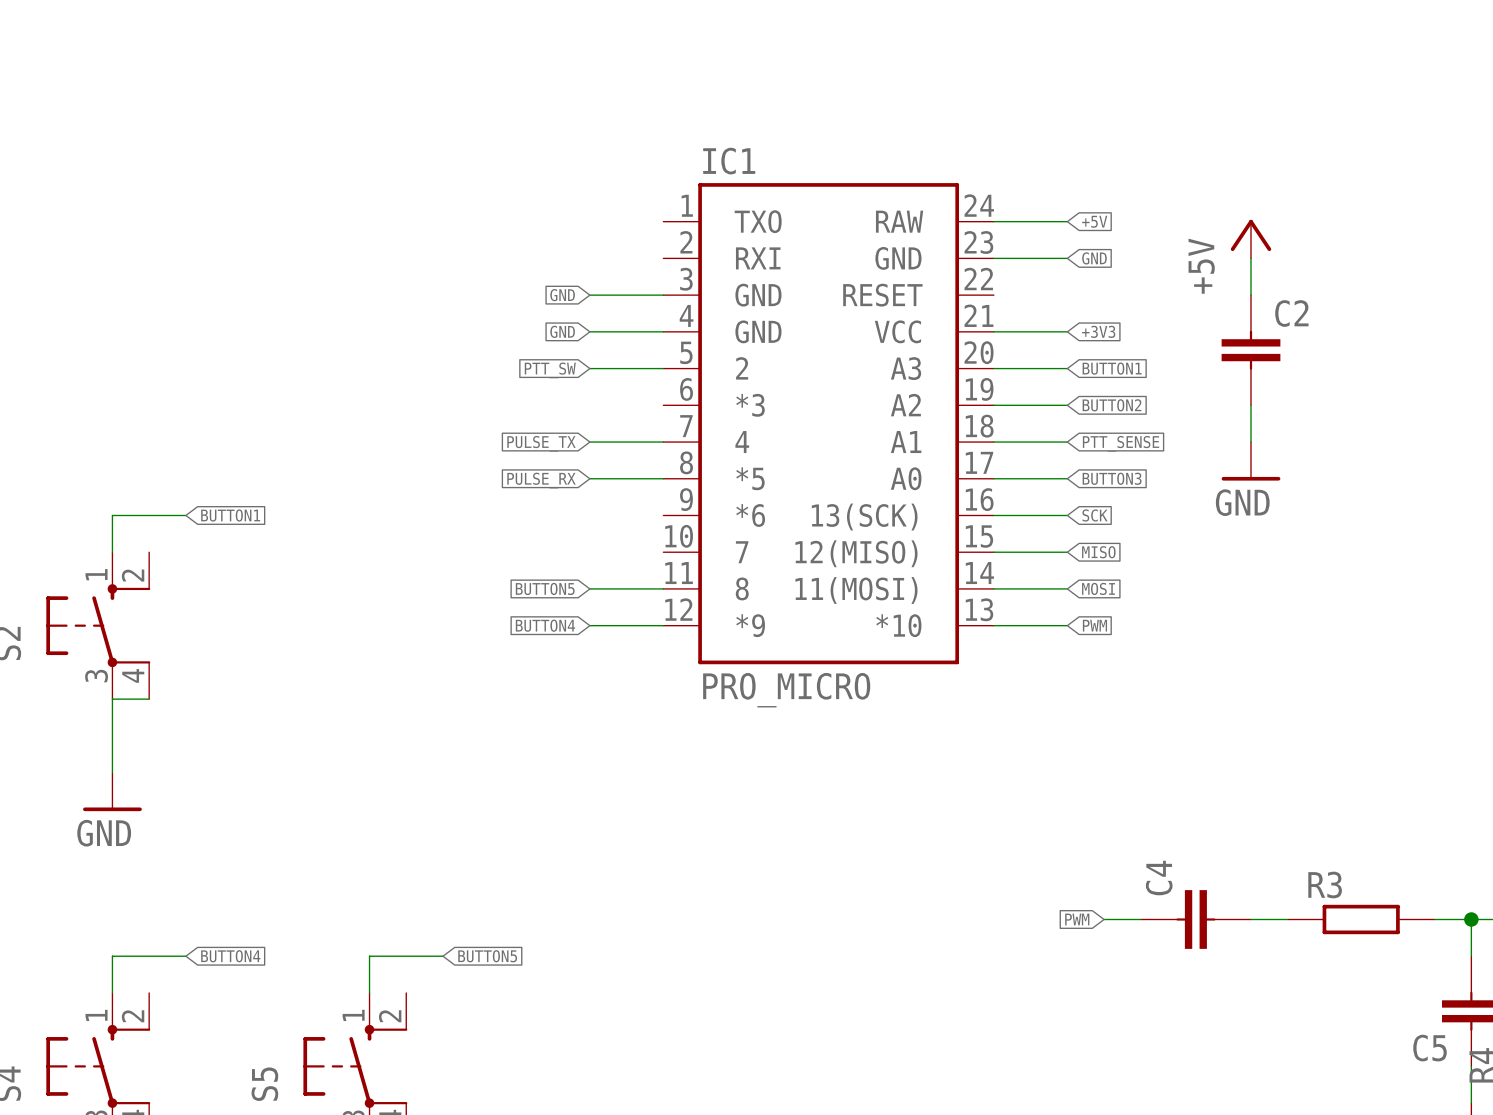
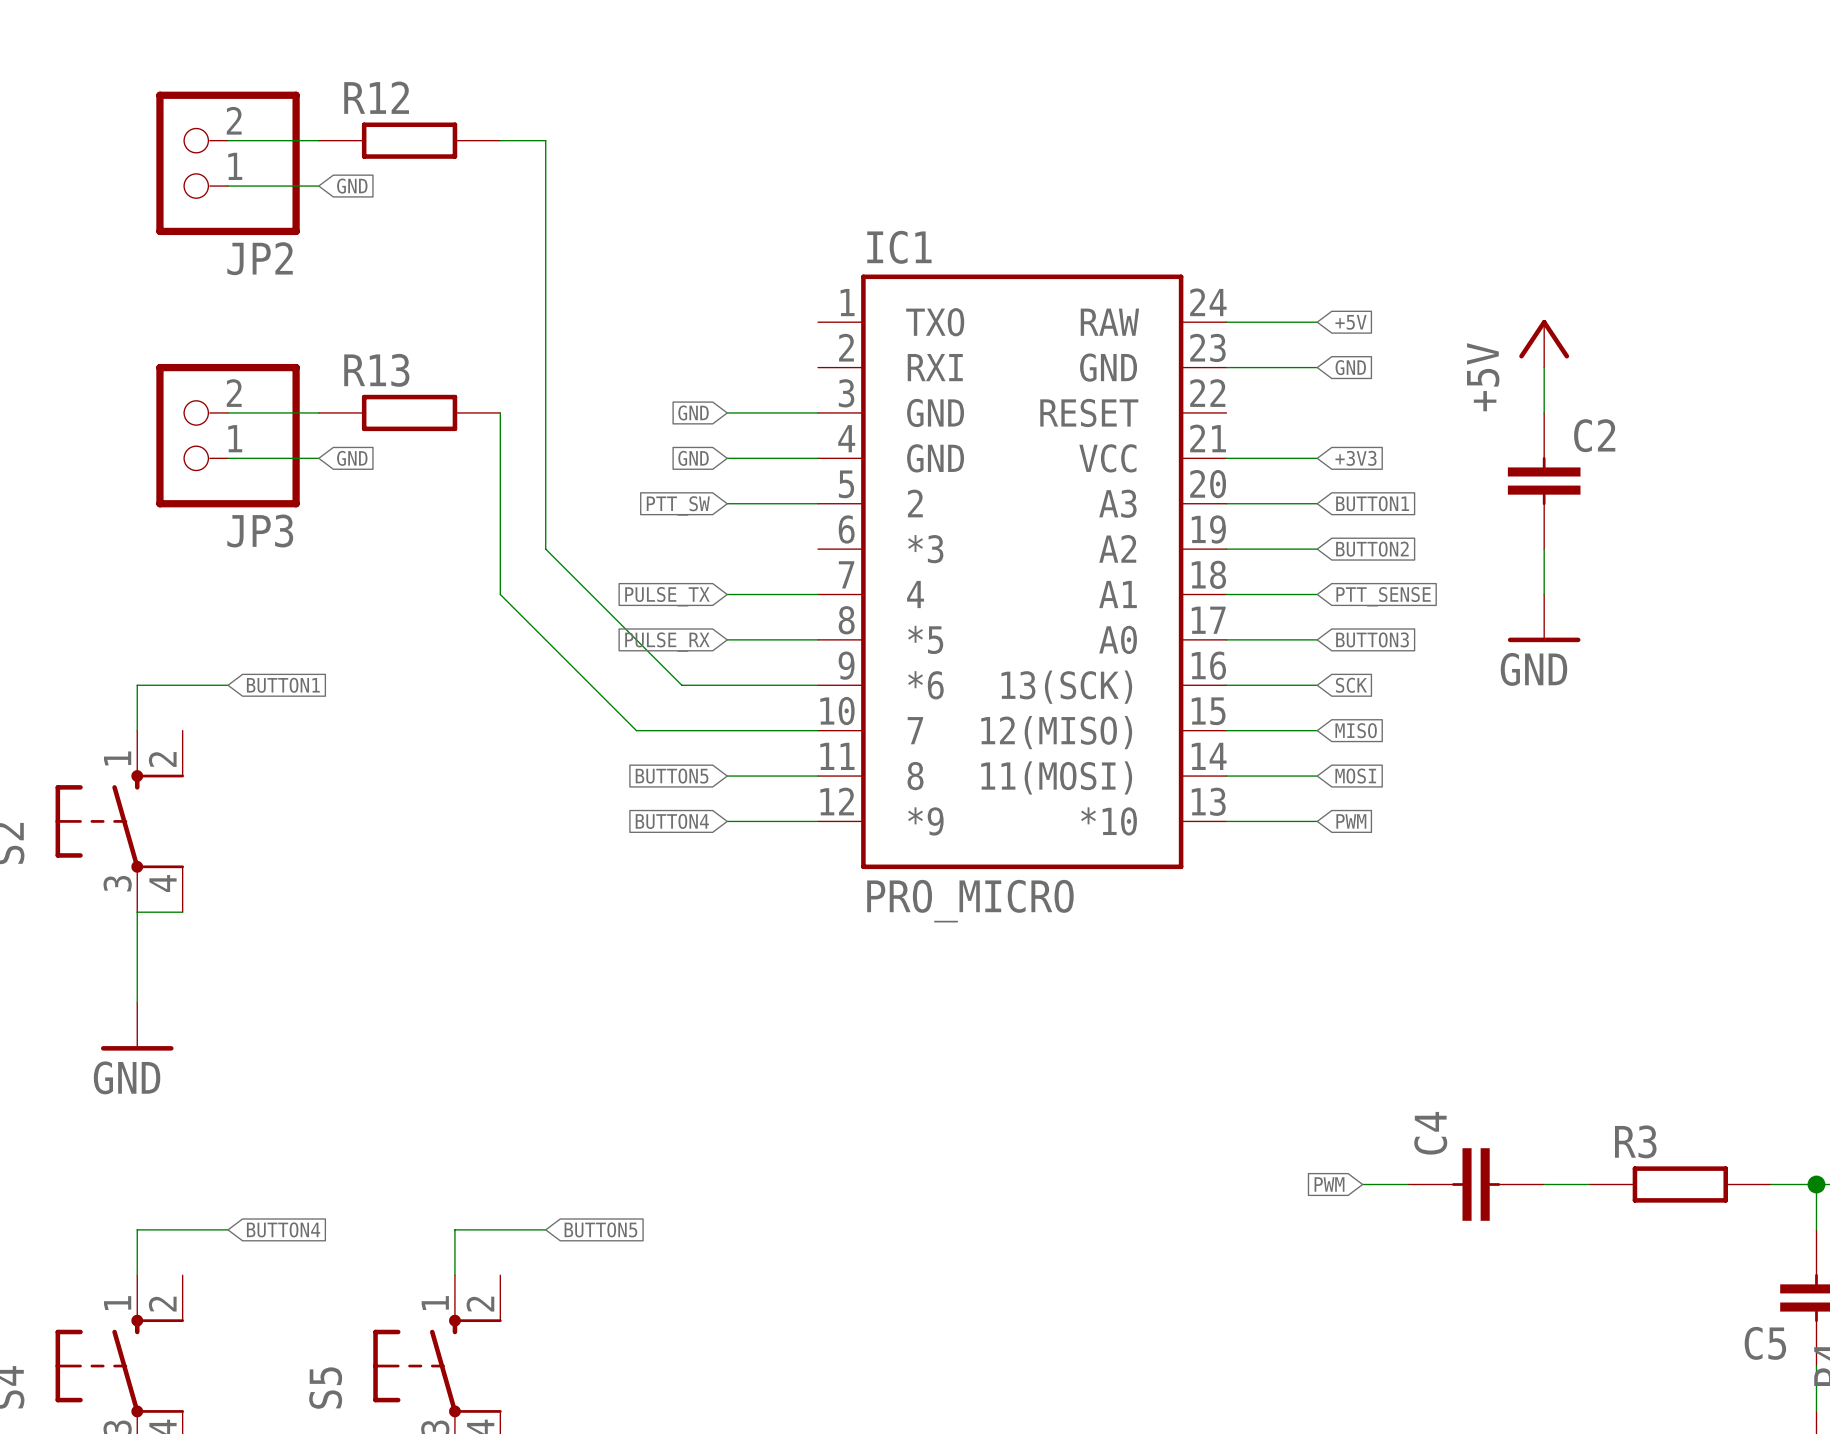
wire: none -> (228, 140) (318, 140)
R12: none -> (409, 140)
wire: none -> (500, 140) (545, 140) (545, 549) (681, 685) (818, 685)
JP2: none -> (228, 163)
wire: none -> (228, 186) (318, 186)
global label: none -> GND (352, 186)
wire: none -> (228, 412) (318, 412)
R13: none -> (409, 412)
wire: none -> (500, 412) (500, 594) (636, 730) (818, 730)
JP3: none -> (228, 435)
wire: none -> (228, 458) (318, 458)
global label: none -> GND (352, 458)

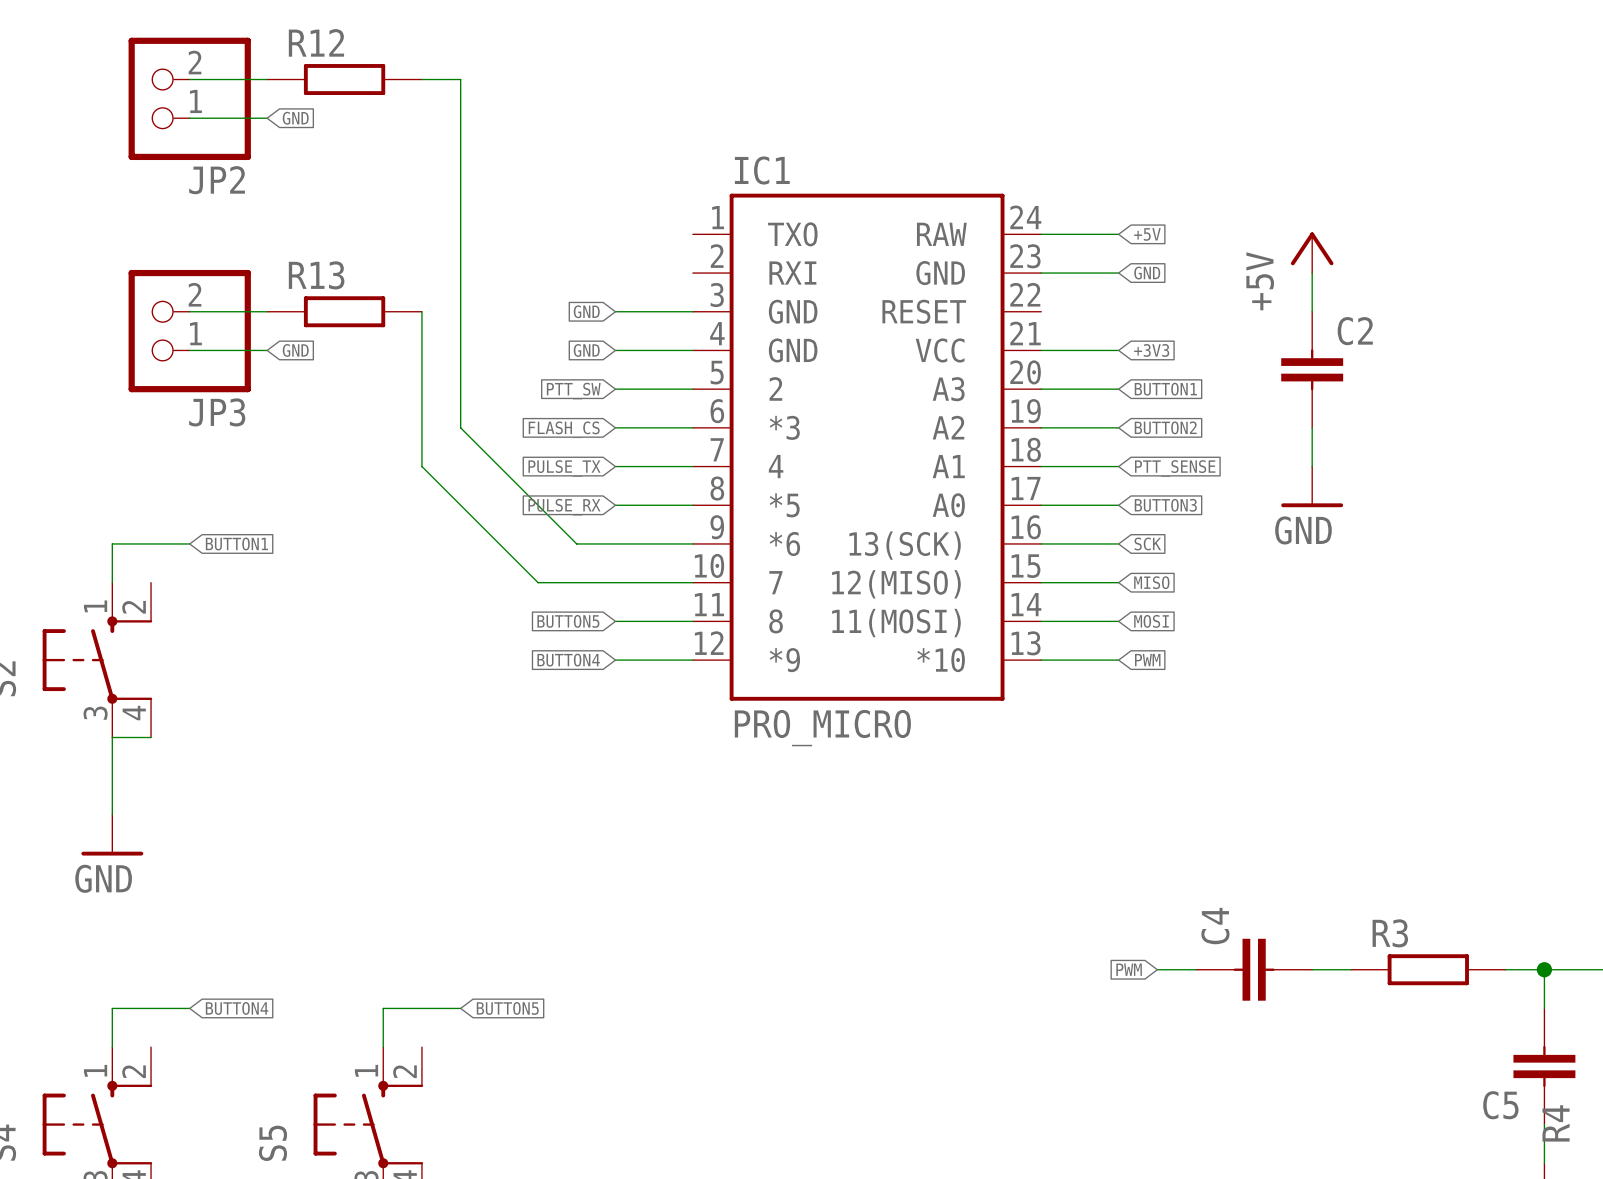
wire: none -> (615, 427) (692, 427)
global label: none -> FLASH_CS (564, 429)

